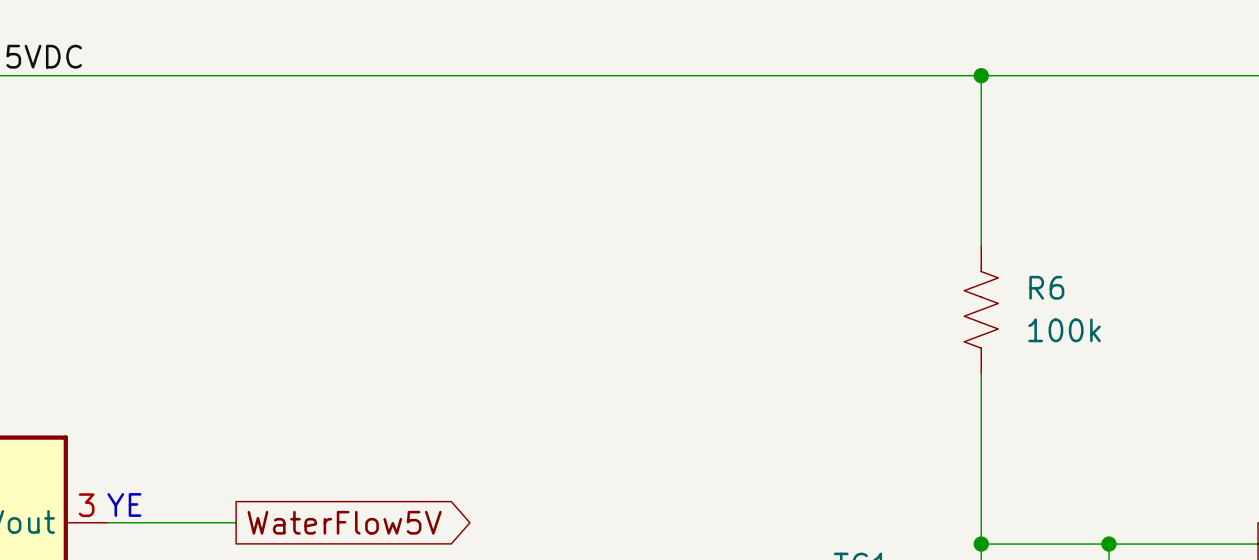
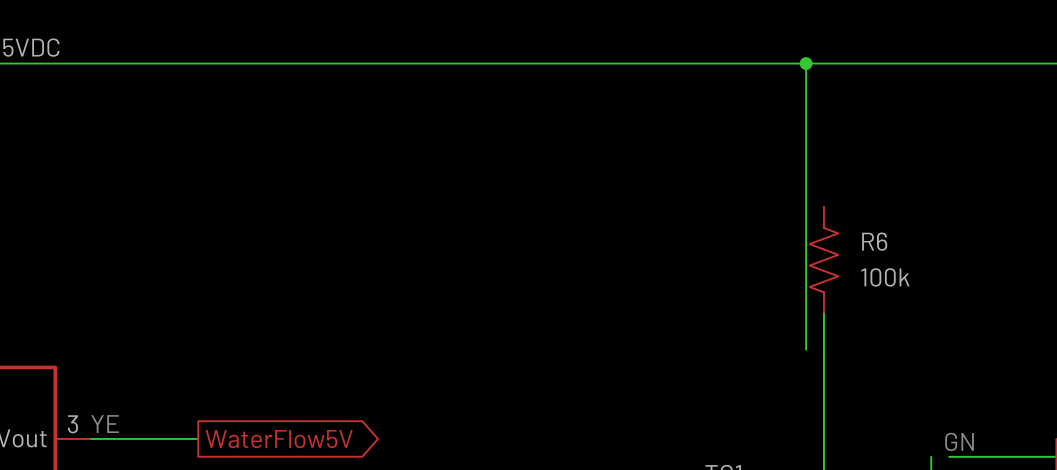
wire: none -> (806, 63) (806, 349)
wire: (981, 75) (981, 245) -> none
junction position: (981, 75) -> (806, 63)
text: none -> GN (959, 441)
wire: (981, 544) (1130, 544) -> none
junction: (981, 544) -> none
junction: (1108, 544) -> none

